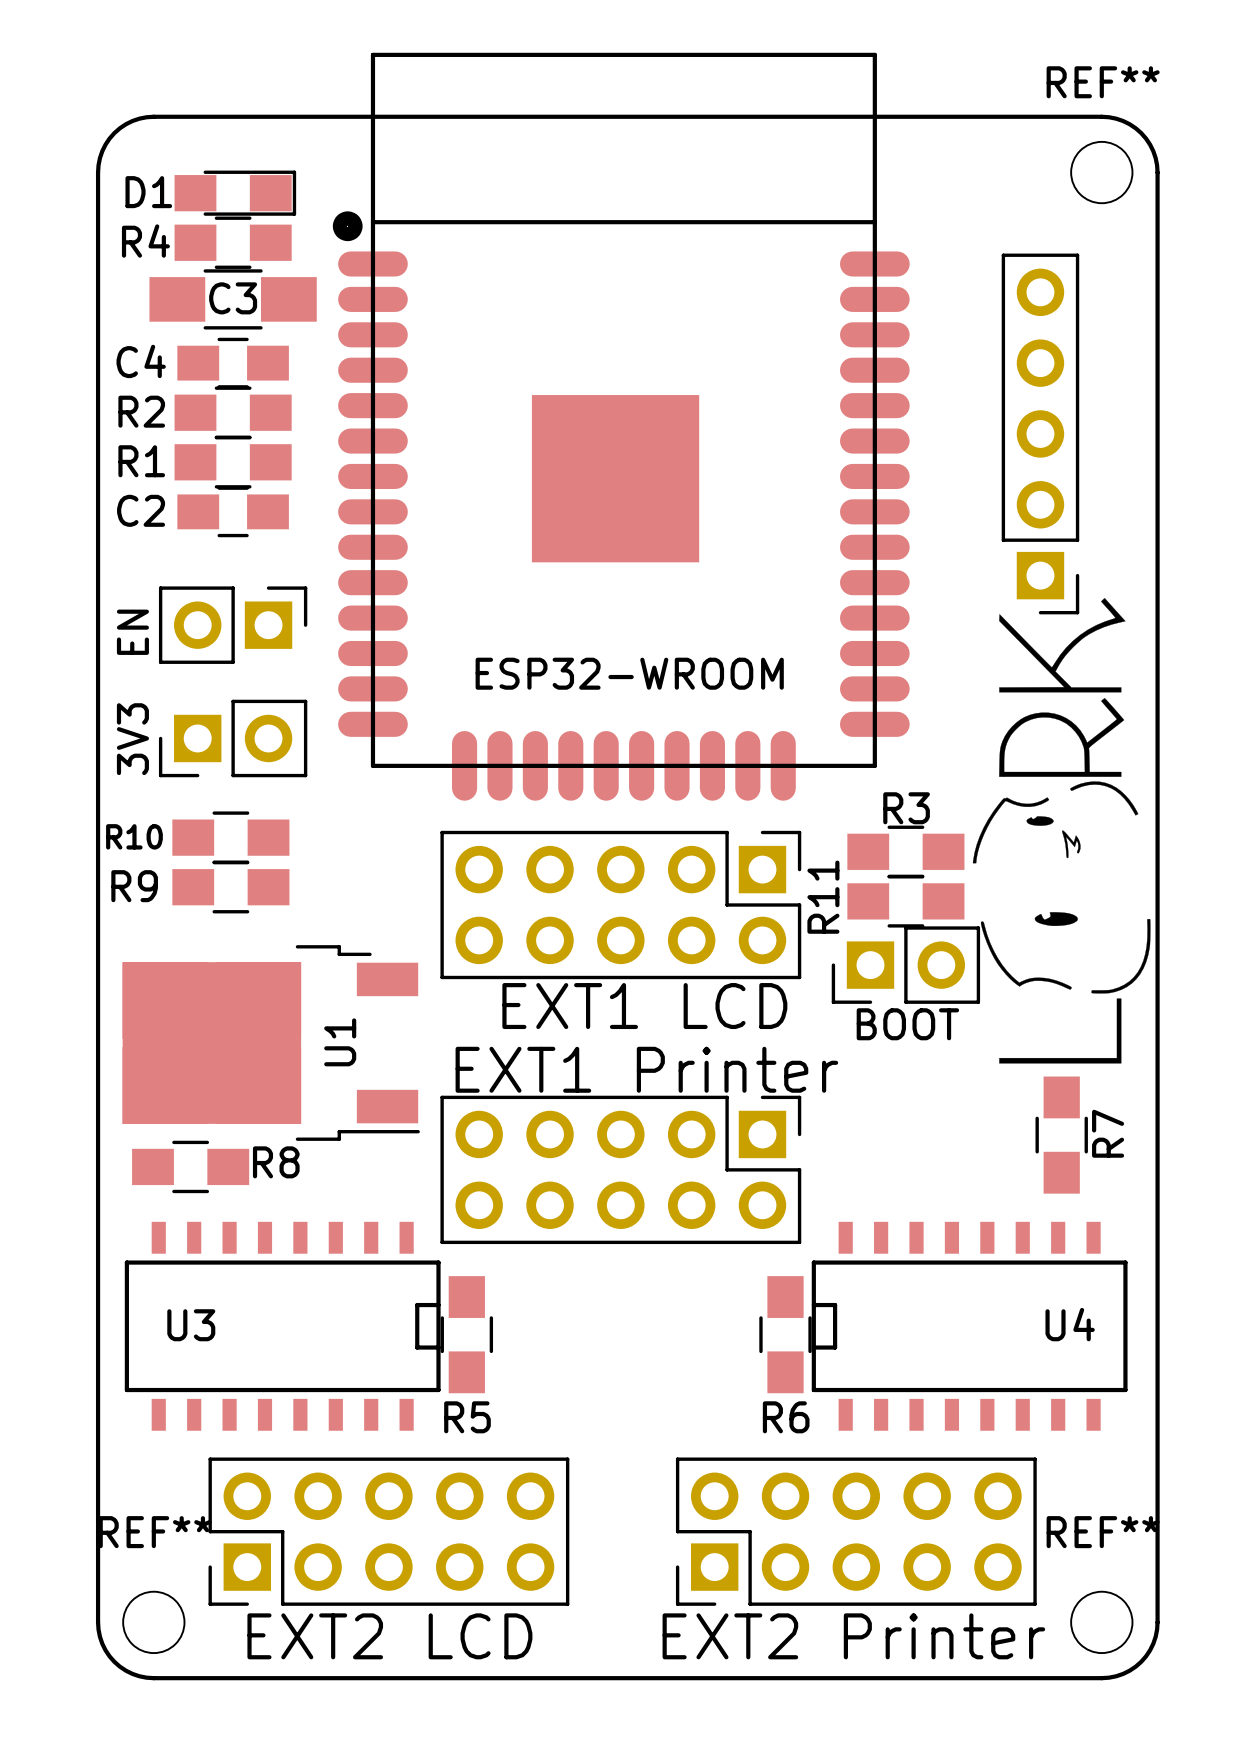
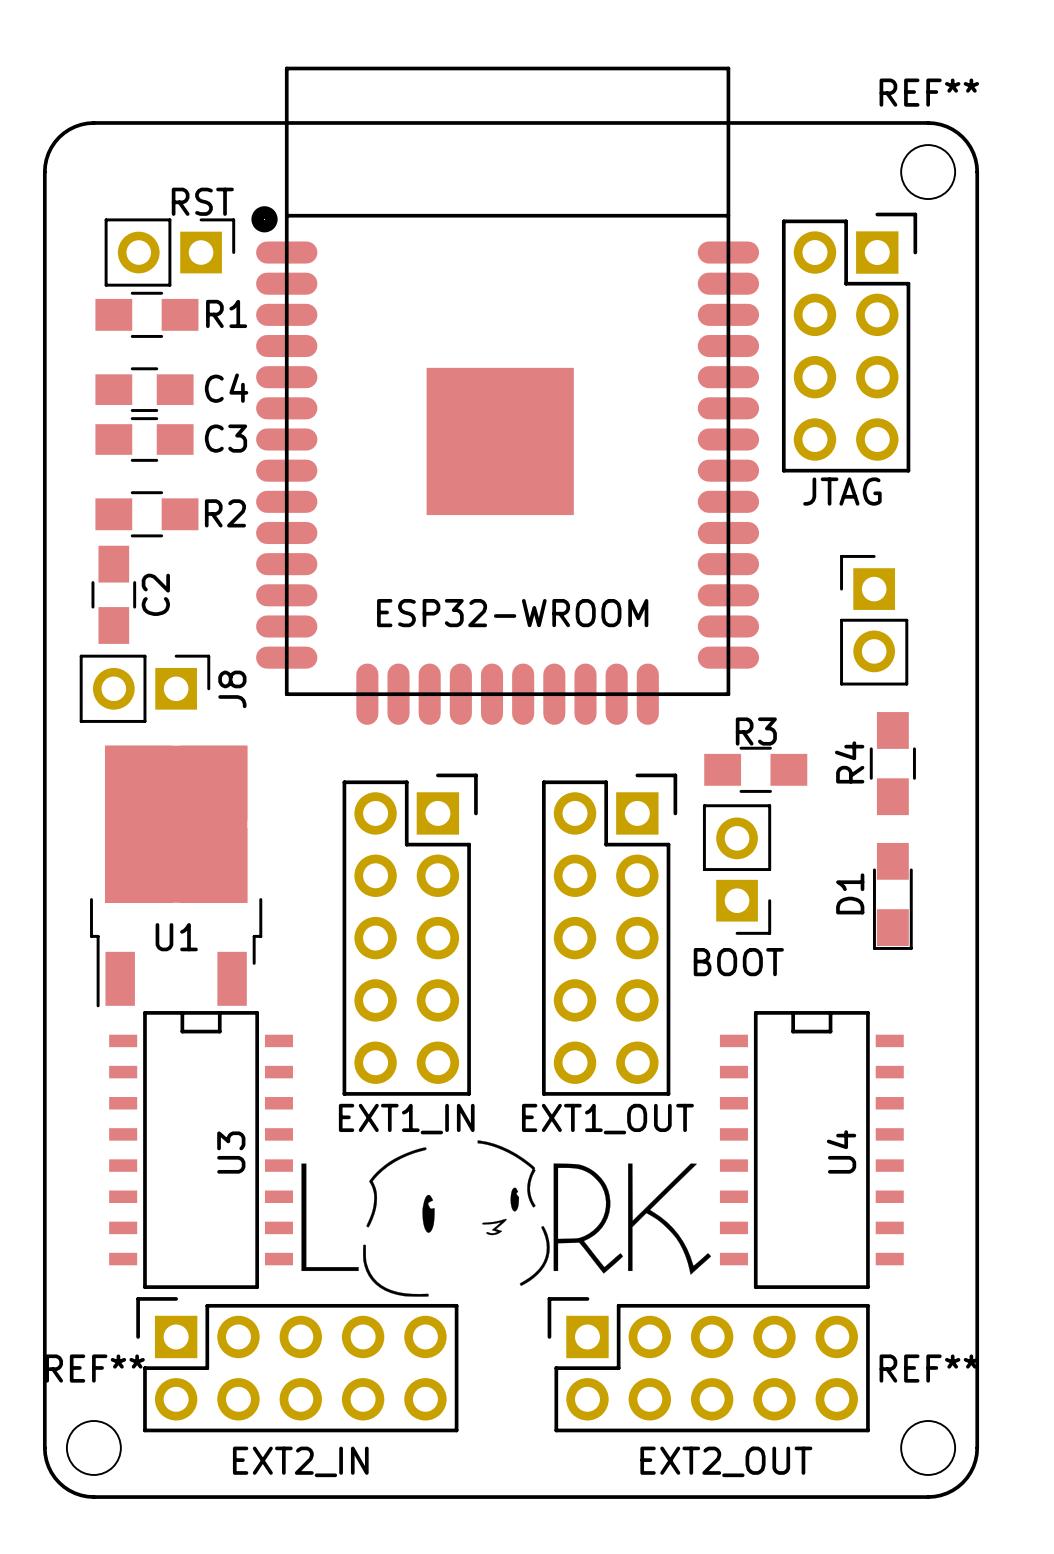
D1 rotation: 0° (235, 193) -> 90° clockwise (892, 896)
D1 position: (235, 193) -> (892, 896)
R4 rotation: 0° (233, 242) -> 90° clockwise (892, 763)
R4 position: (233, 242) -> (892, 763)
part: none -> RST (169, 252)
C3 footprint: [149, 269, 317, 330] -> [95, 417, 194, 462]
C3 name position: C3 (233, 298) -> C3 (225, 438)
C4 name position: C4 (141, 361) -> C4 (226, 388)
C4 position: (233, 363) -> (144, 389)
part: none -> JTAG (849, 342)
R2 name position: R2 (141, 411) -> R2 (225, 513)
R2 position: (233, 412) -> (146, 514)
part: (1040, 433) -> none
R1 name position: R1 (141, 461) -> R1 (226, 313)
R1 position: (233, 462) -> (146, 314)
C2 name position: C2 (141, 510) -> C2 (155, 594)
C2 rotation: 0° (233, 511) -> 90° clockwise (113, 594)
C2 position: (233, 511) -> (113, 594)
drawing: [972, 598, 1151, 1064] -> none
part: EN (233, 625) -> none
part: none -> (874, 620)
part: 3V3 (233, 738) -> none
J8: none -> (144, 688)
R10: (230, 837) -> none
R9: (230, 887) -> none
R11: (905, 901) -> none
part: EXT1 LCD (620, 904) -> none
part rotation: 0° (905, 965) -> 90° counterclockwise (737, 869)
part: none -> EXT1_IN (410, 934)
part: none -> EXT1_OUT (609, 934)
U1 rotation: 0° (271, 1043) -> 90° clockwise (176, 876)
R7: (1061, 1135) -> none
R8: (190, 1166) -> none
part: EXT1 Printer (620, 1169) -> none
drawing: none -> [301, 1140, 711, 1297]
U4 name position: U4 (1070, 1324) -> U4 (841, 1151)
U3 name position: U3 (191, 1325) -> U3 (231, 1152)
U3 rotation: 0° (282, 1326) -> 90° counterclockwise (201, 1150)
U4 rotation: 0° (969, 1326) -> 90° clockwise (811, 1150)
R5: (466, 1334) -> none
R6: (785, 1334) -> none
part footprint: [208, 1457, 570, 1606] -> [136, 1297, 459, 1433]
part footprint: [675, 1457, 1037, 1606] -> [547, 1297, 870, 1433]
part value: EXT2 LCD (389, 1636) -> EXT2_IN (300, 1461)
part value: EXT2 Printer (853, 1636) -> EXT2_OUT (726, 1461)

